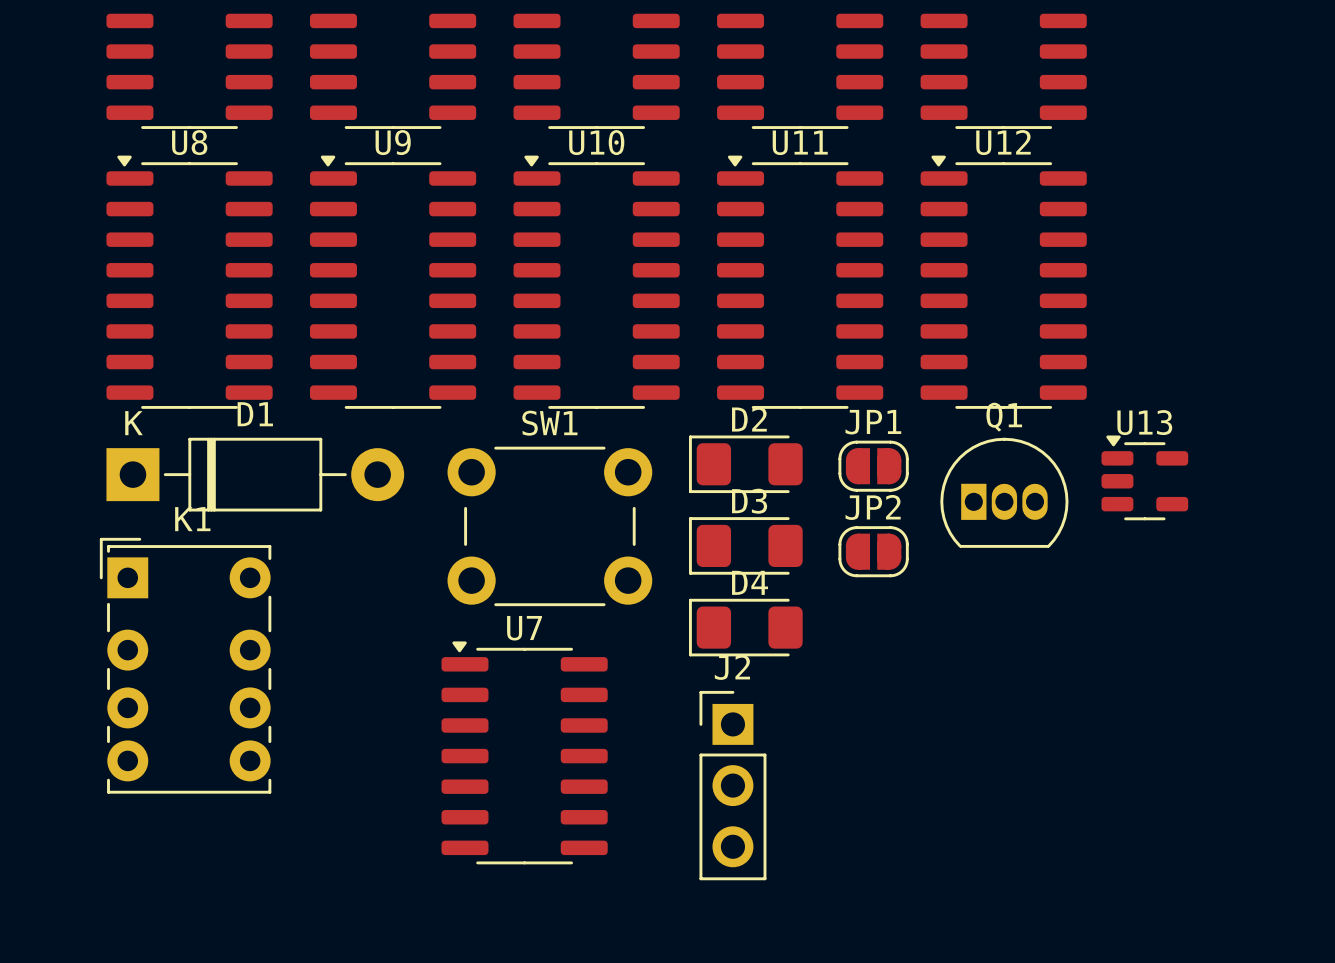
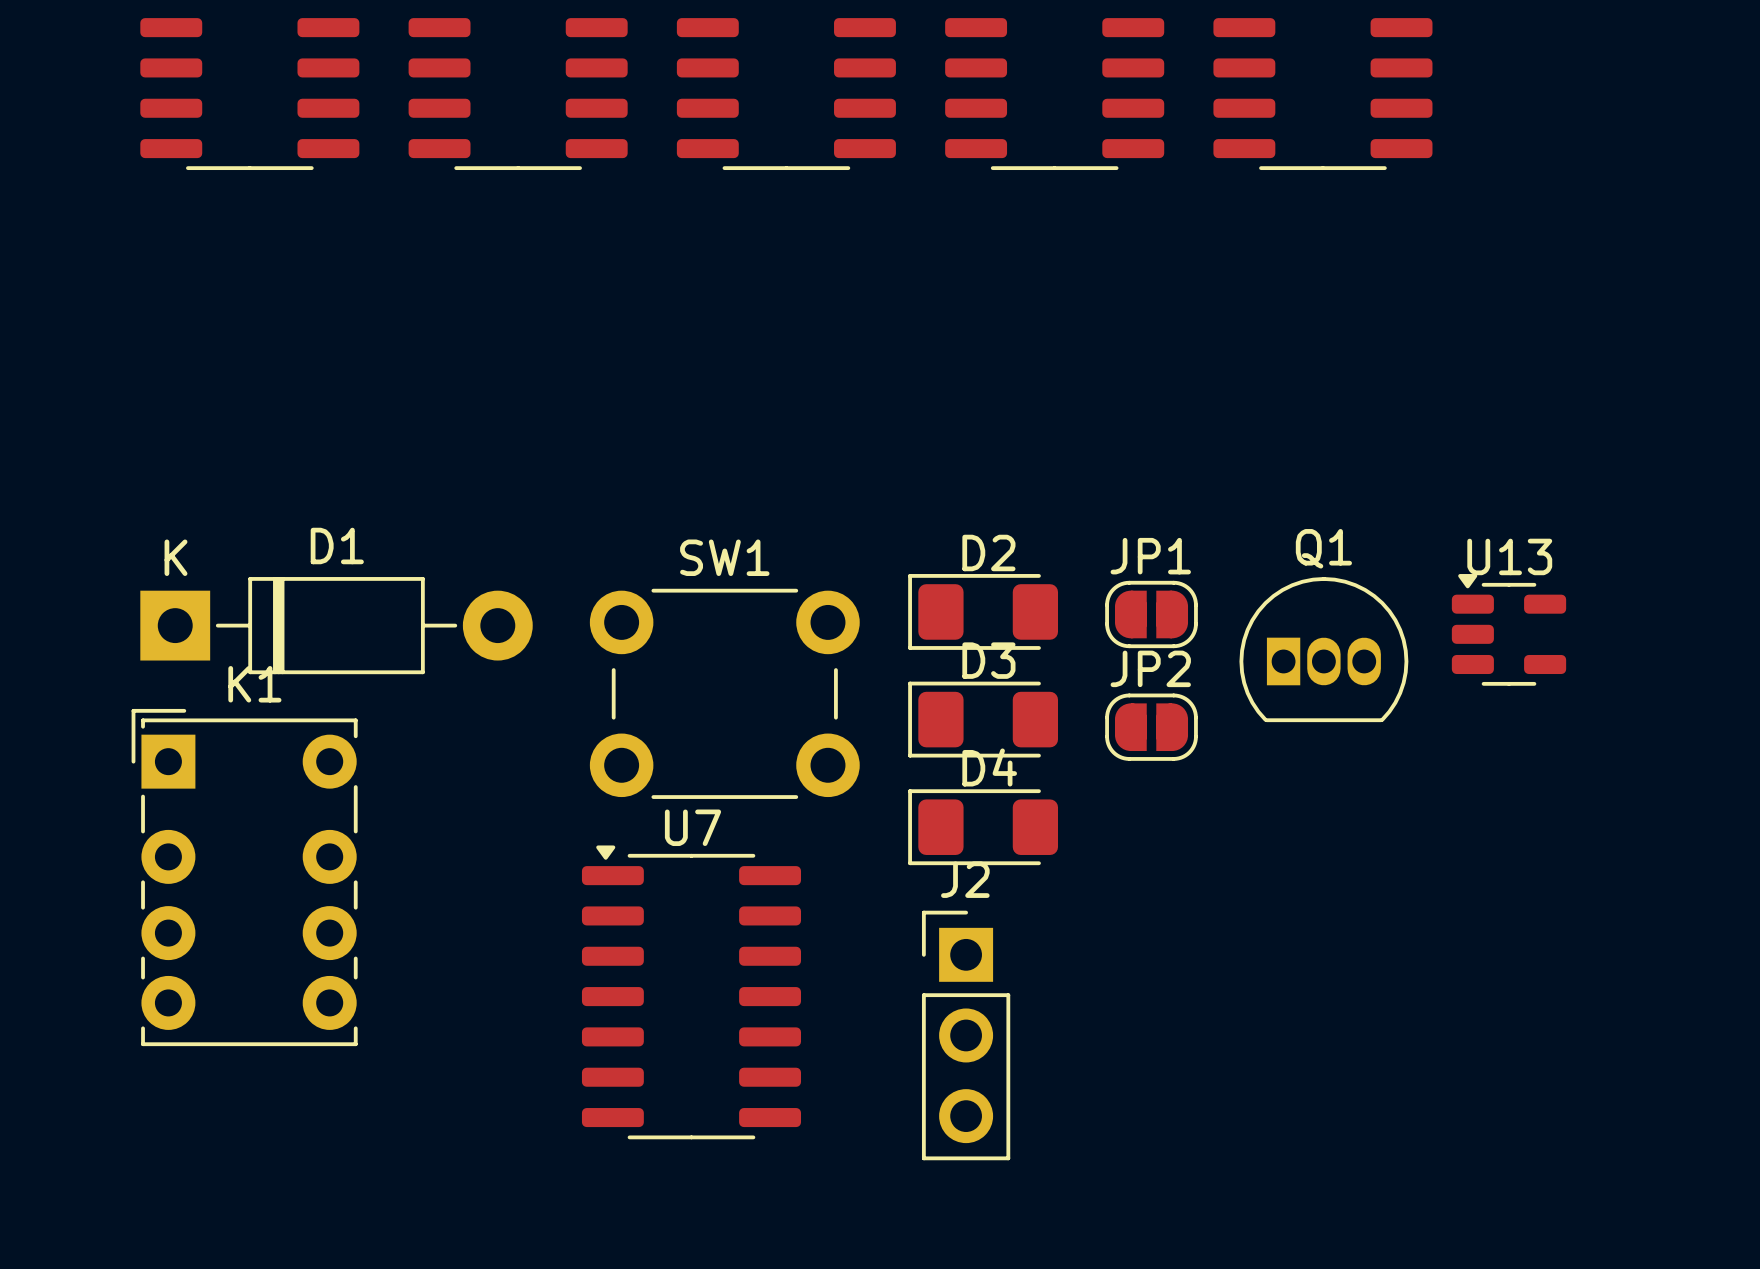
U8: (189, 282) -> none
U9: (393, 282) -> none
U10: (596, 282) -> none
U11: (800, 282) -> none
U12: (1003, 282) -> none

